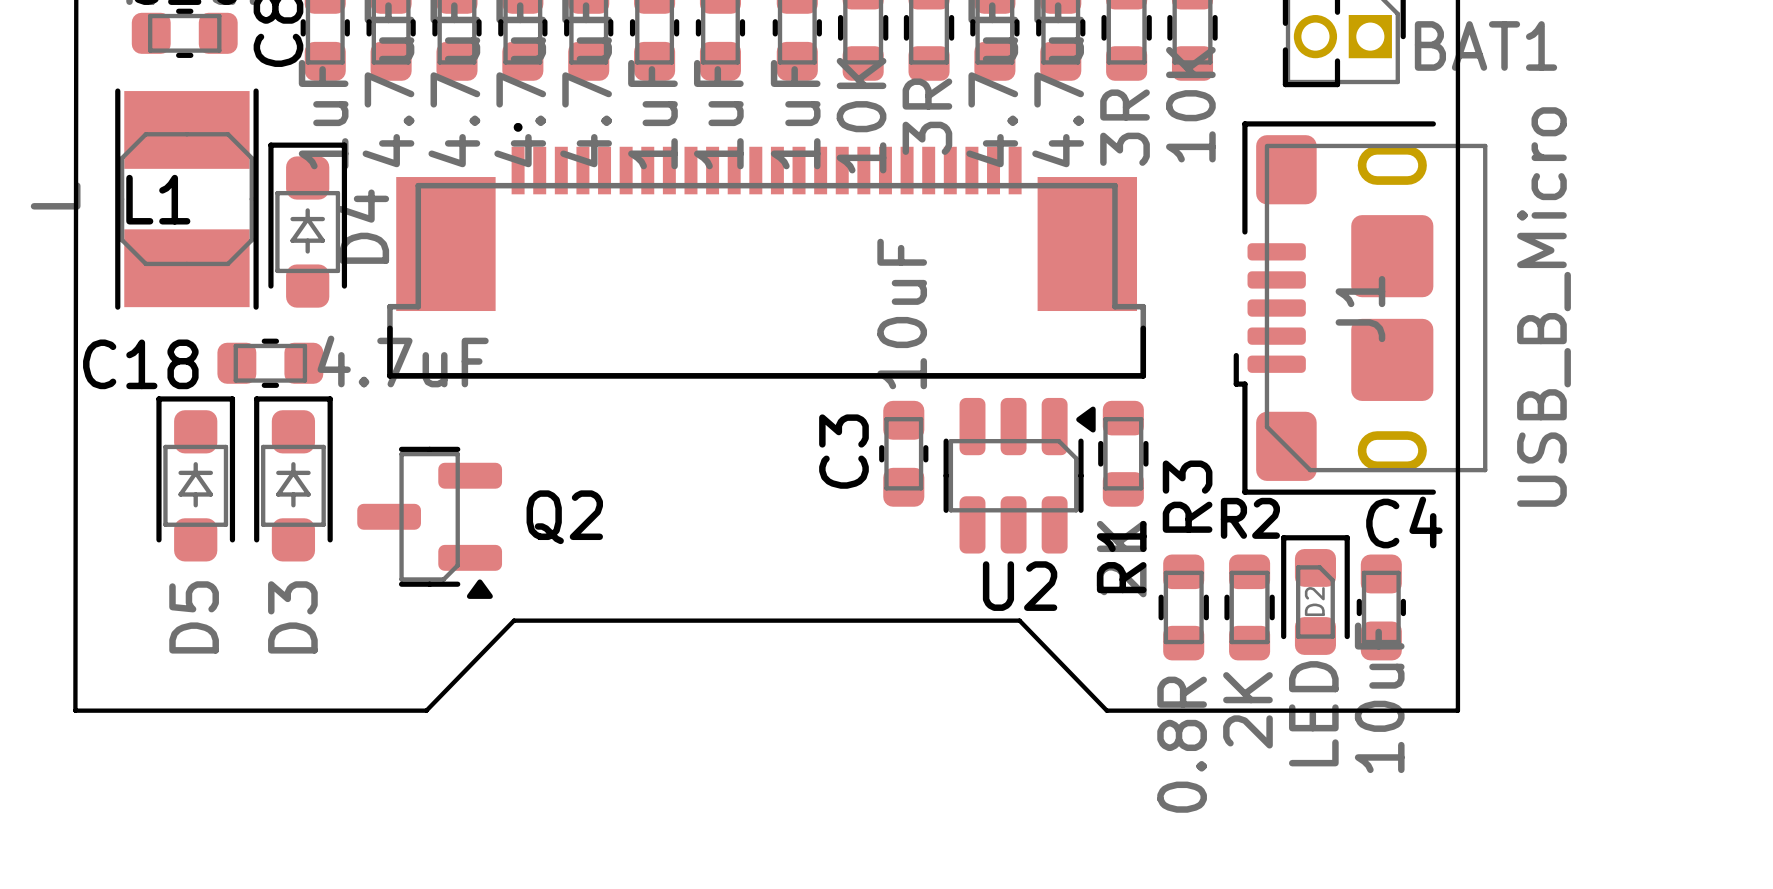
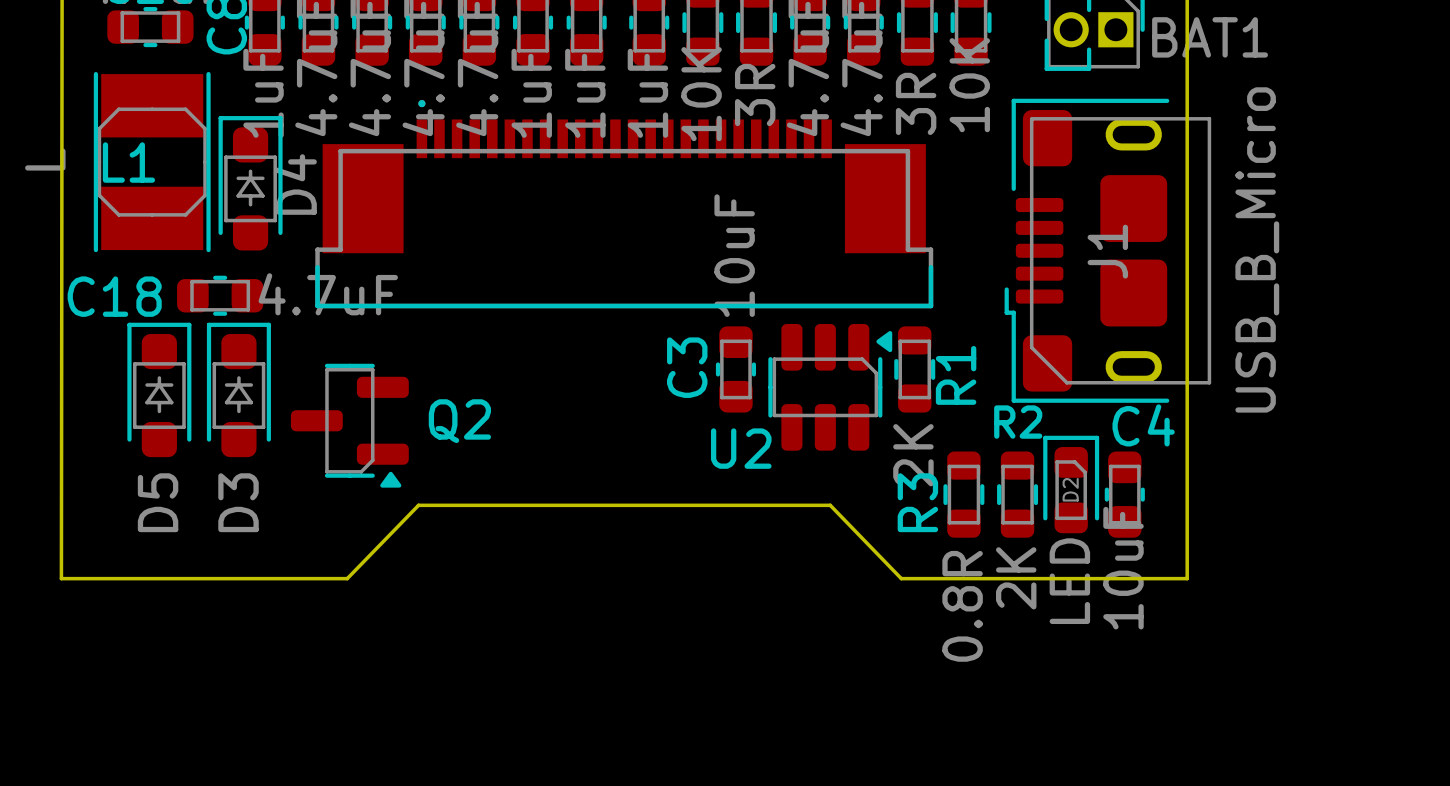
R3 name position: R3 (1187, 496) -> R3 (917, 502)
R1 name position: R1 (1121, 557) -> R1 (956, 375)
U2 name position: U2 (1020, 586) -> U2 (741, 448)

